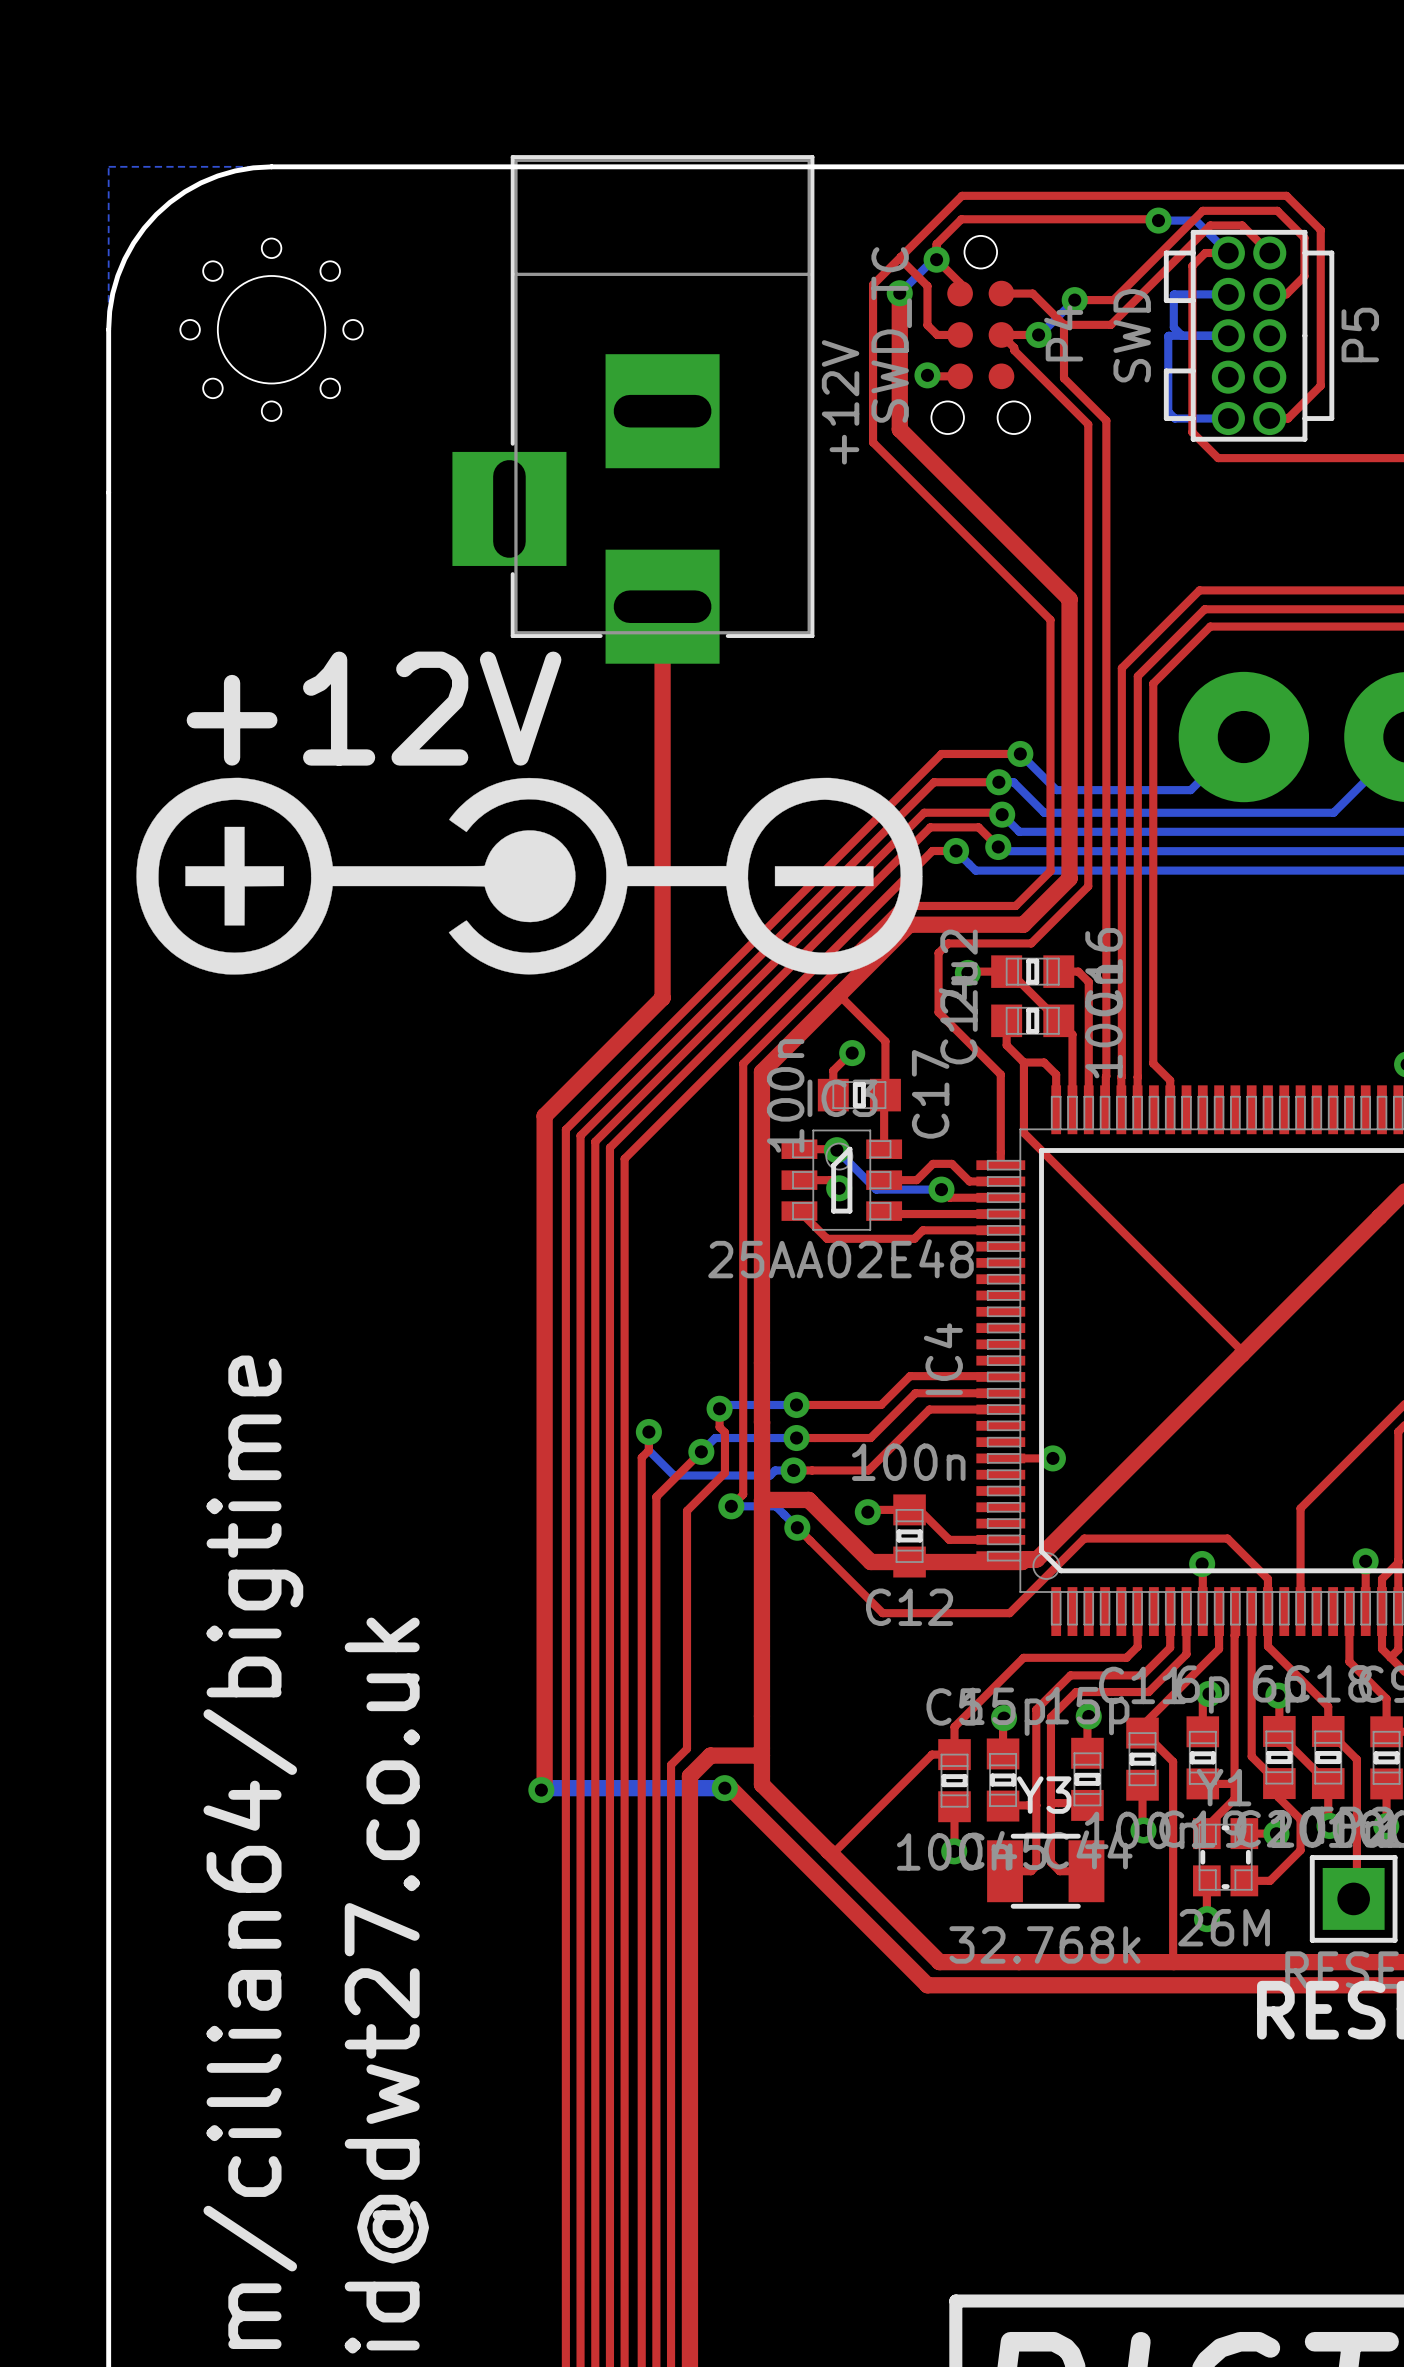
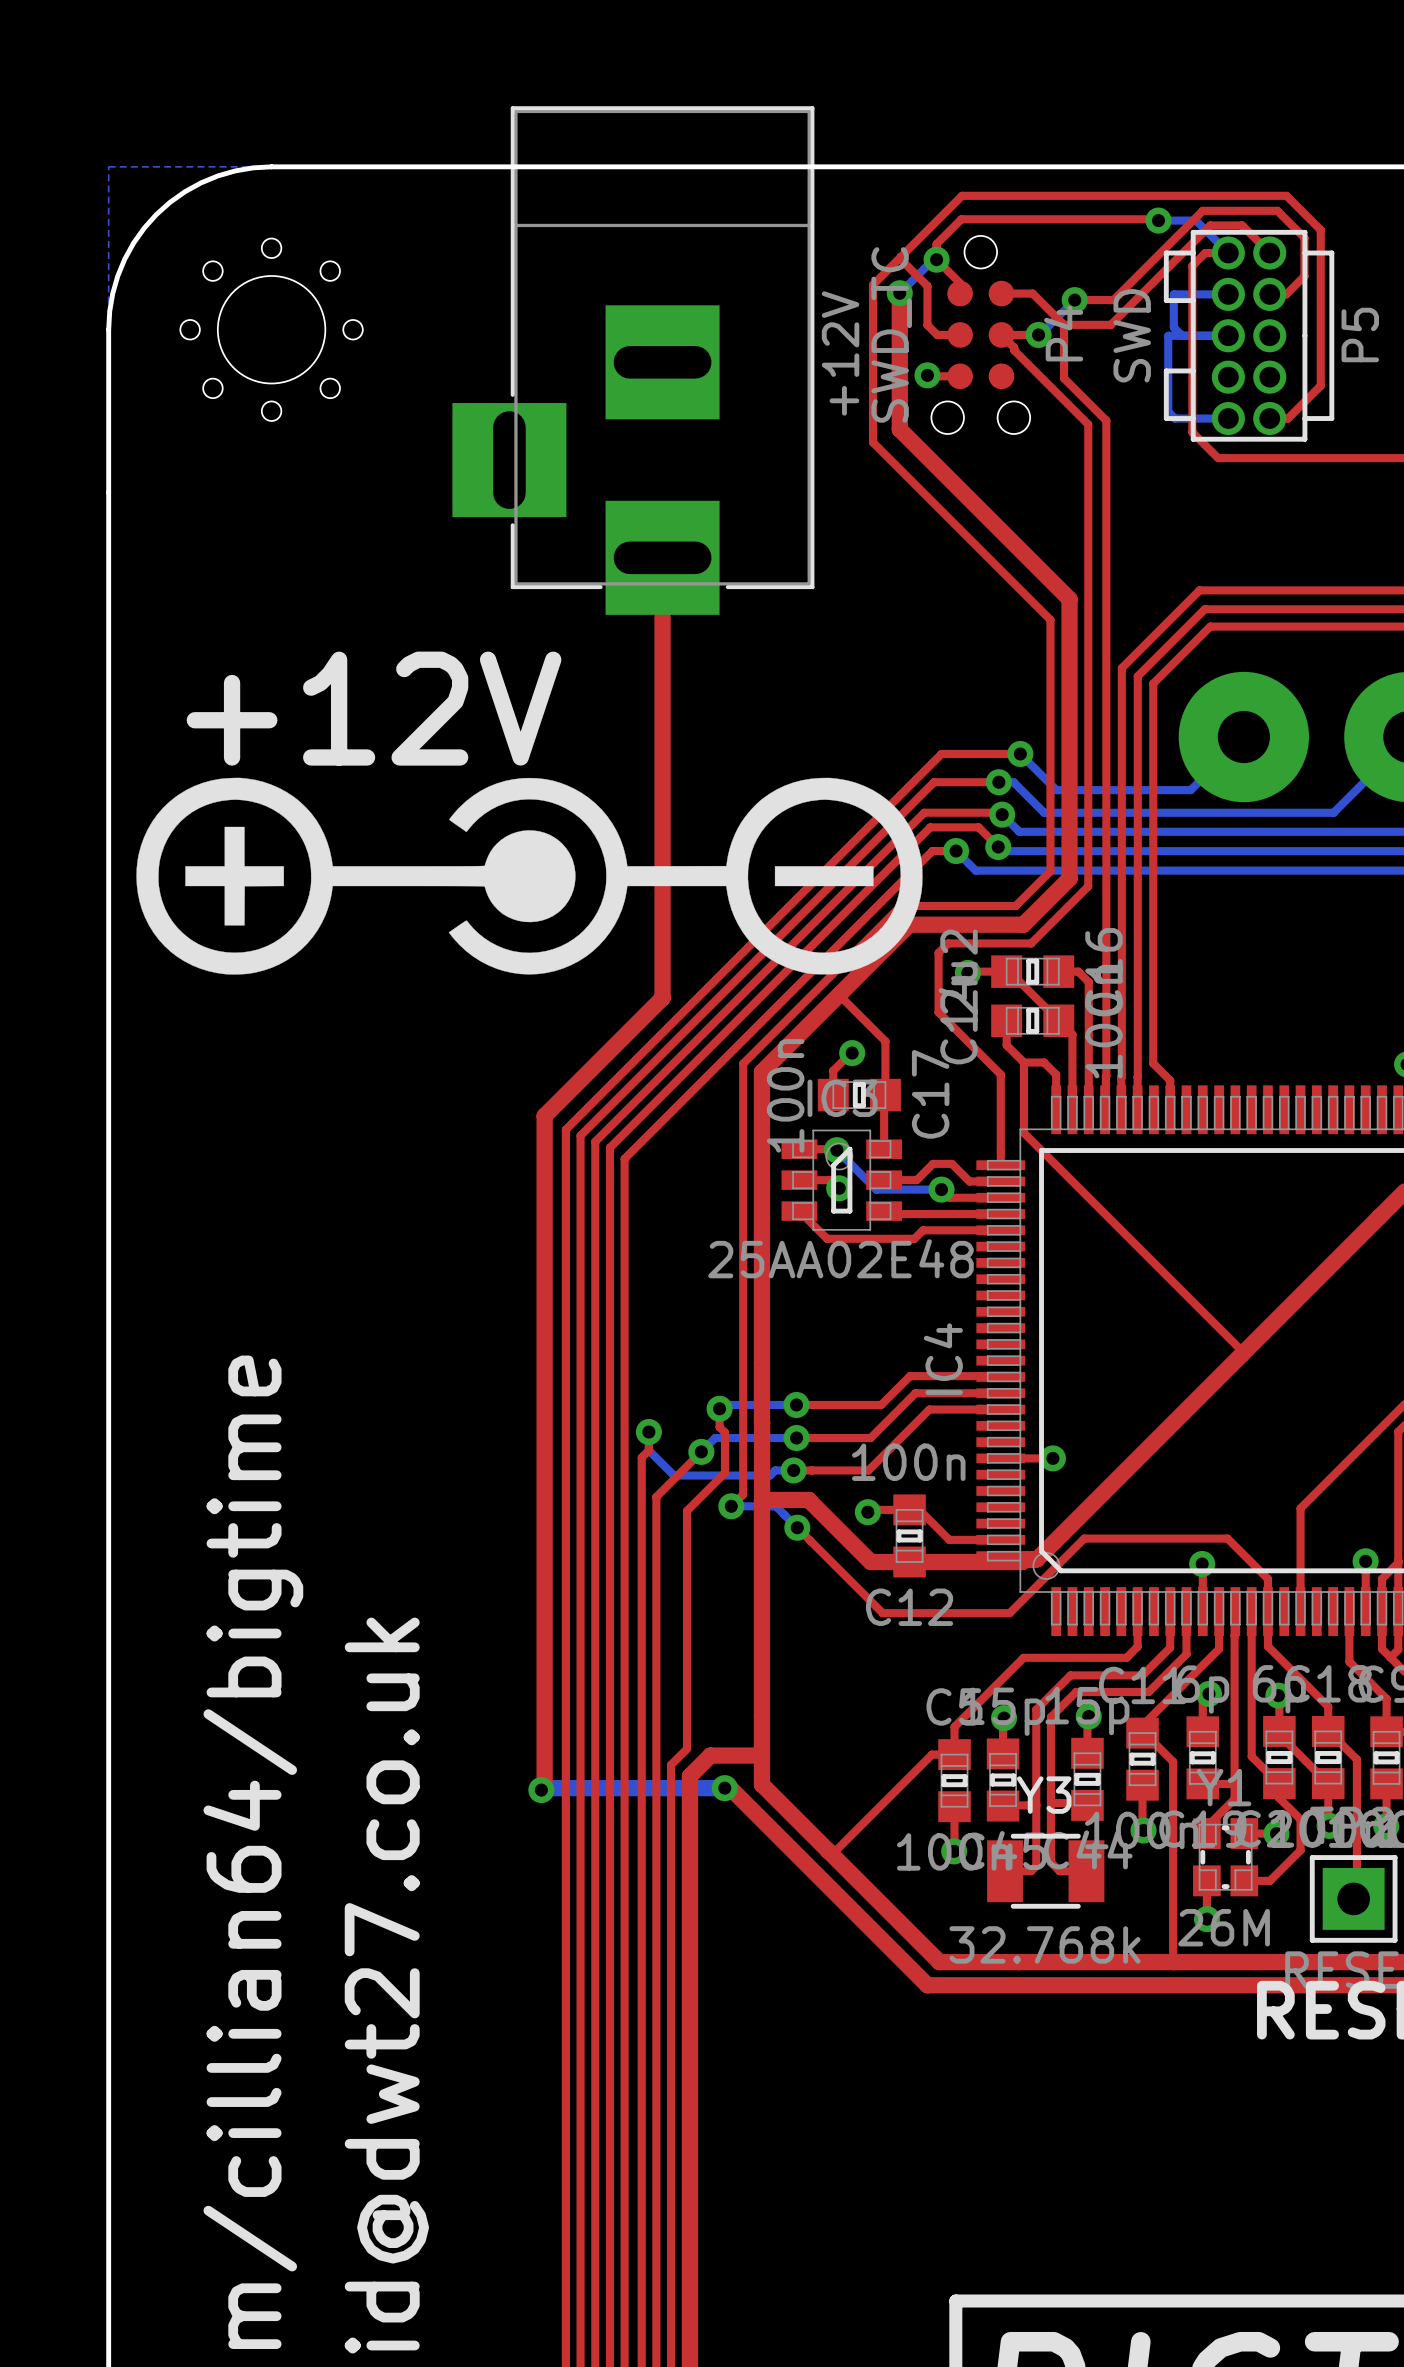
part position: (633, 409) -> (633, 360)

